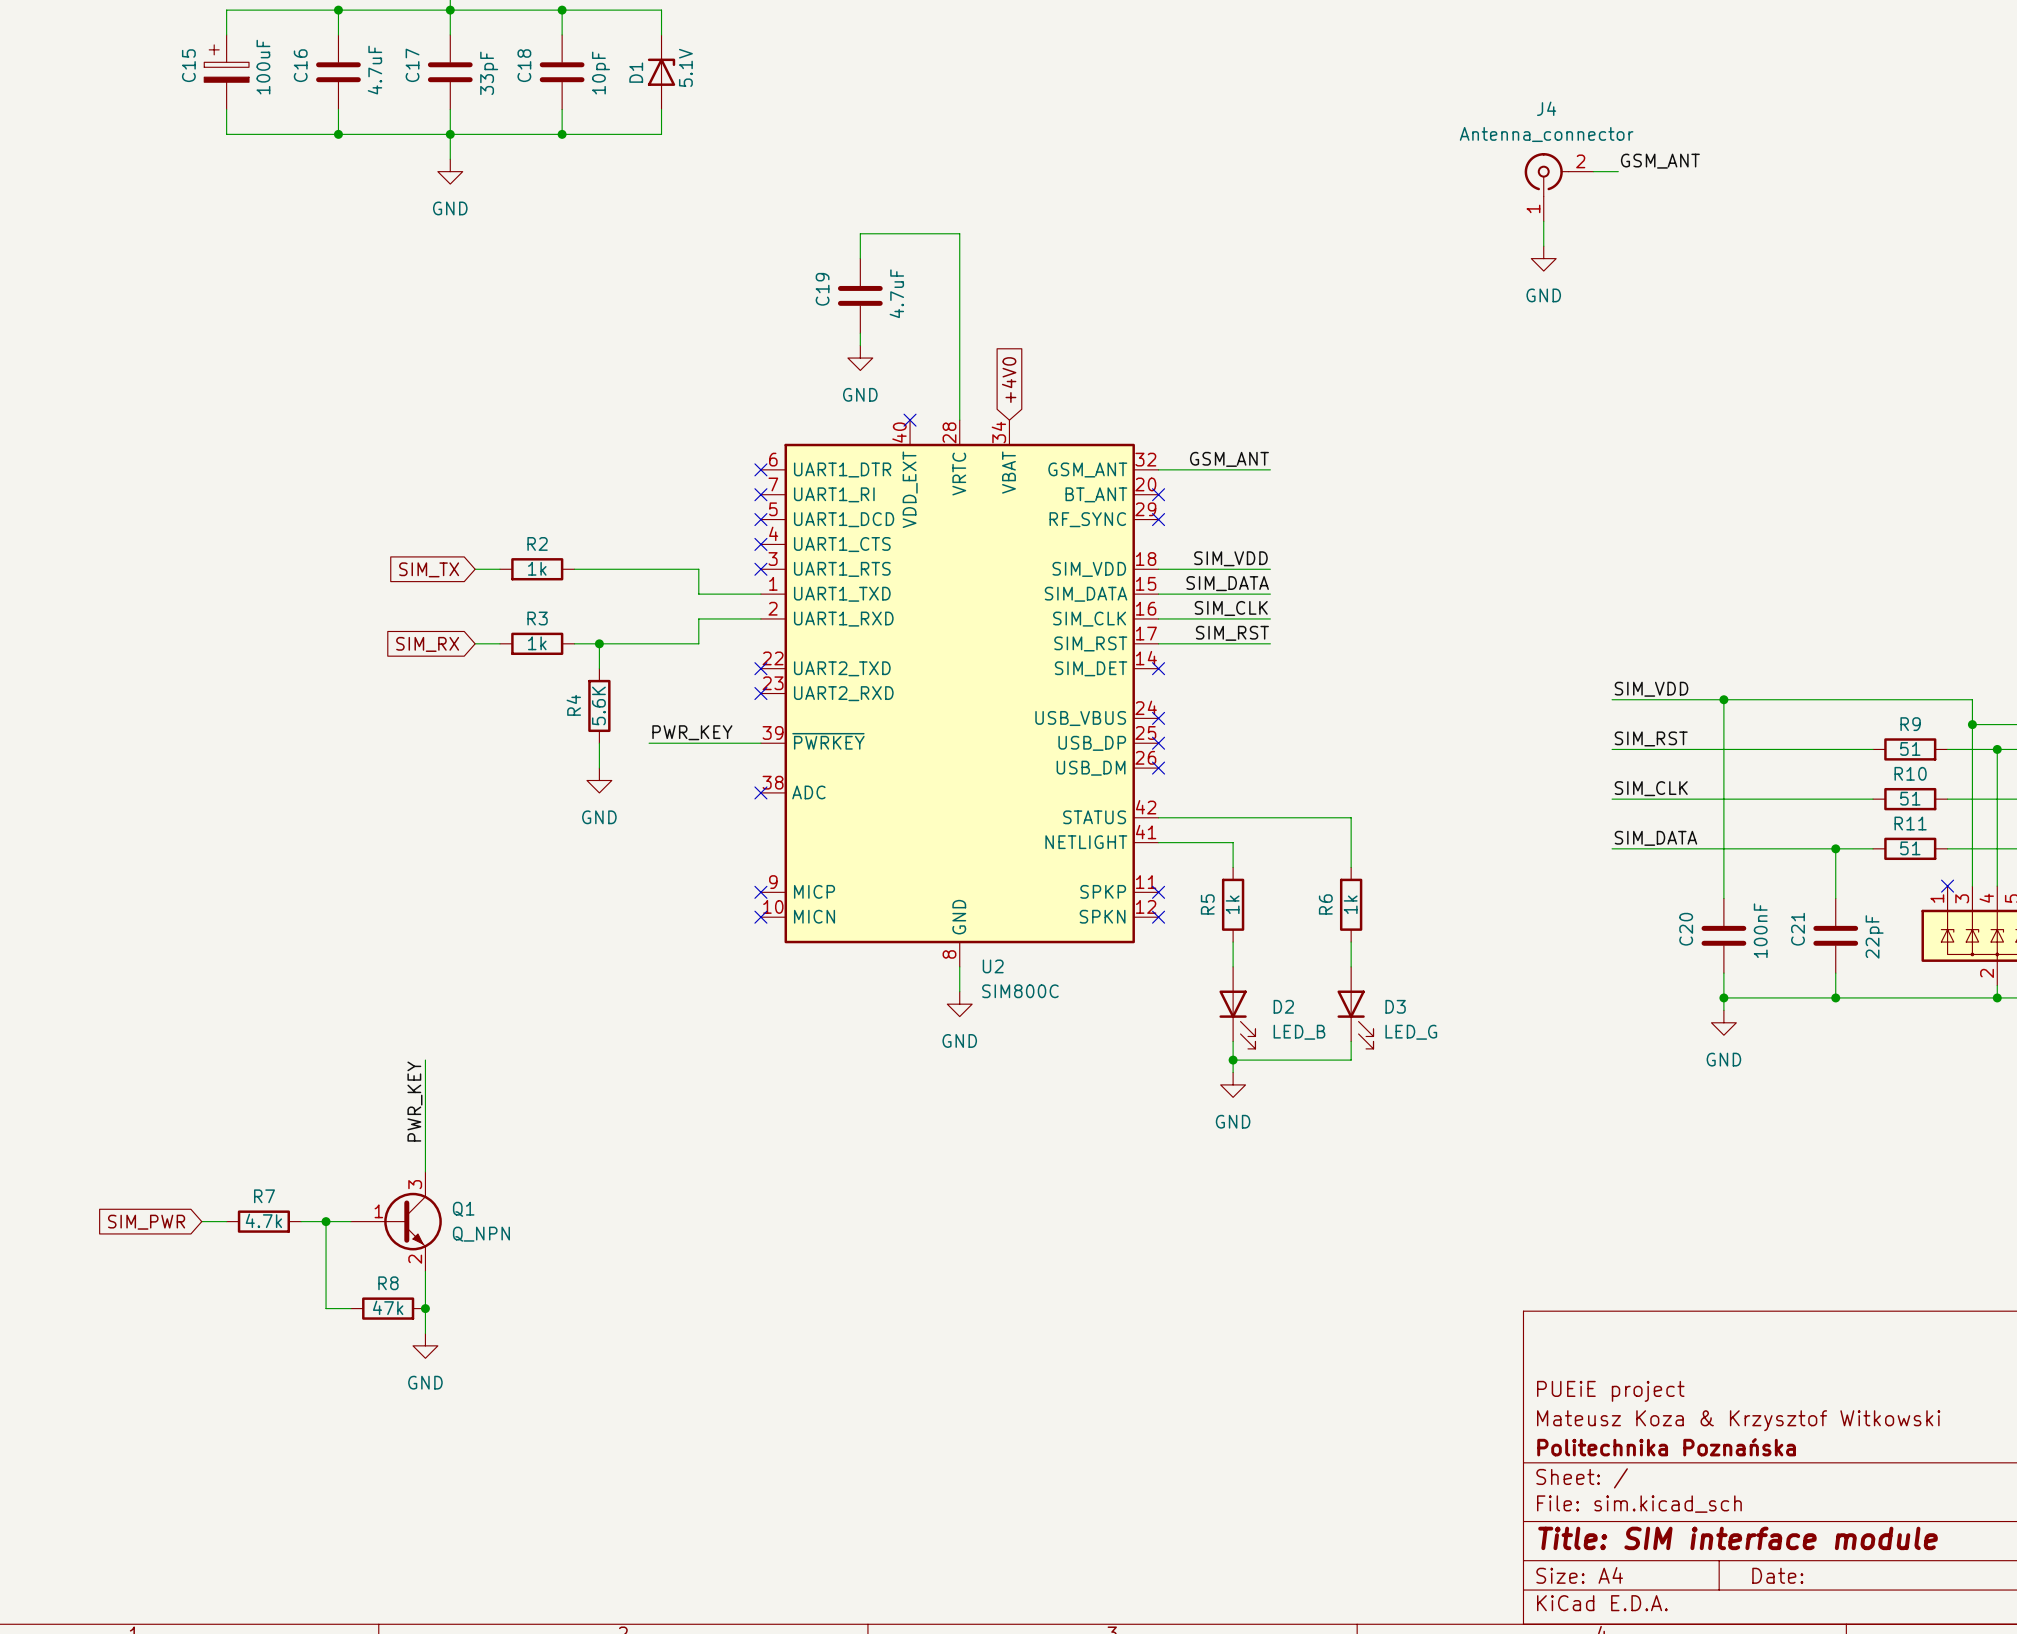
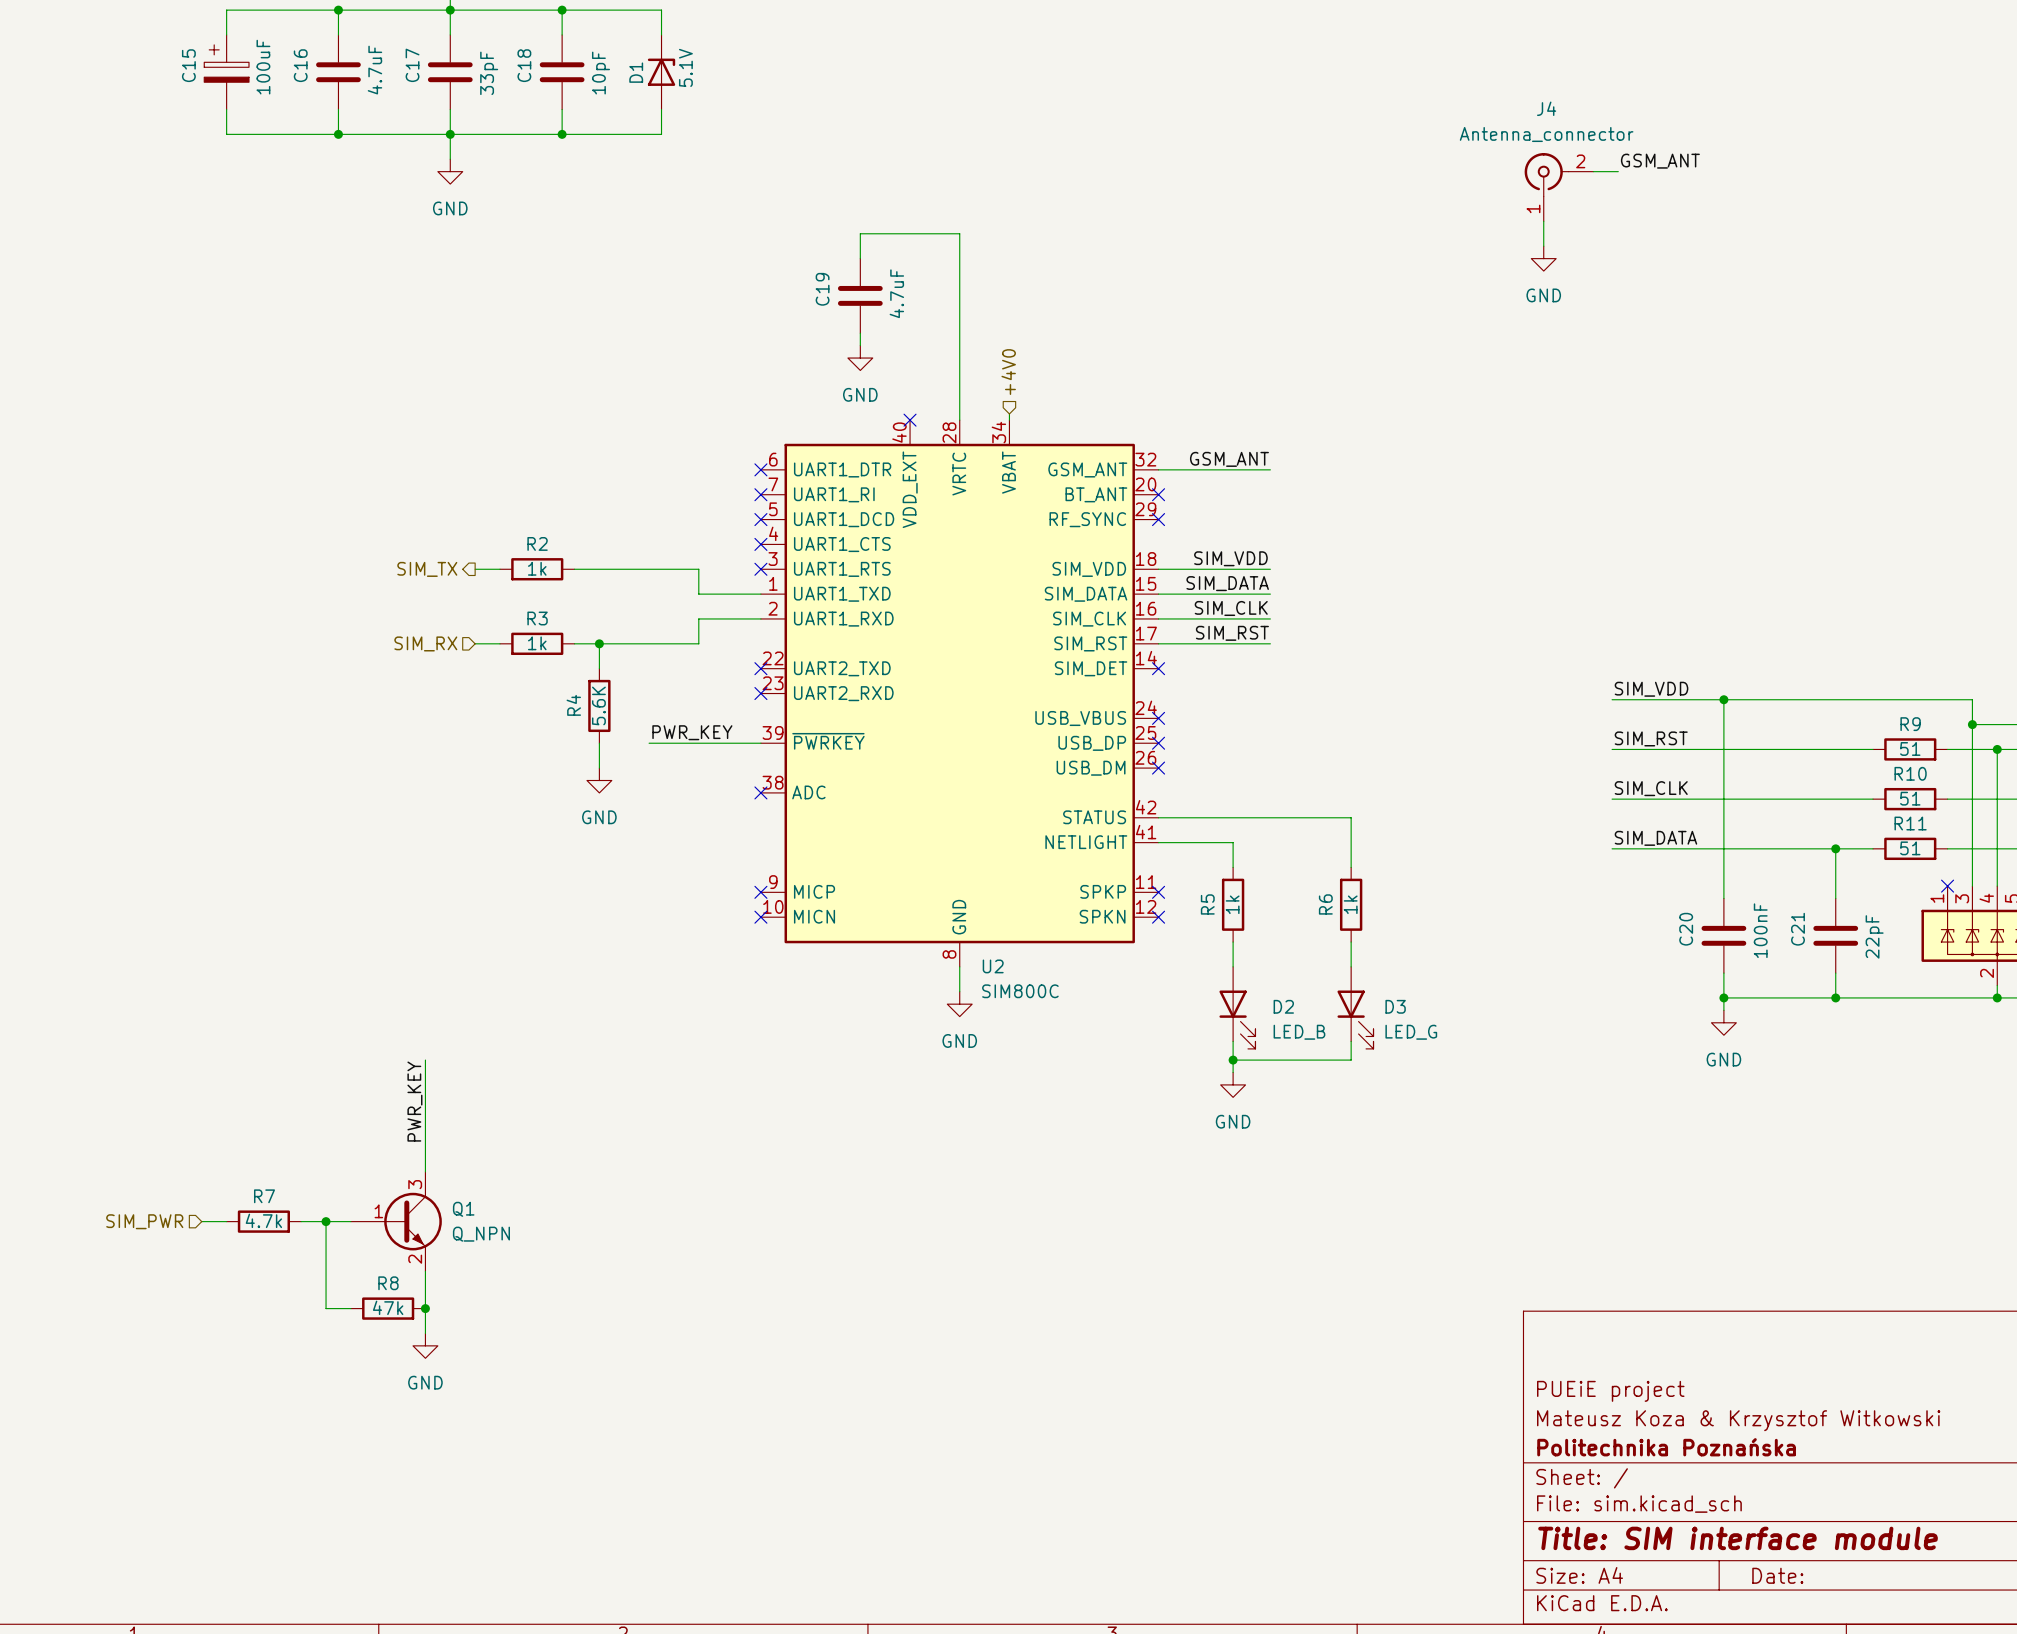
hierarchical label: none -> +4V0 (1008, 372)
global label: +4V0 (1009, 380) -> none
wire: none -> (1009, 413) (1009, 420)
hierarchical label: none -> SIM_TX (427, 569)
global label: SIM_TX (429, 569) -> none
hierarchical label: none -> SIM_RX (425, 643)
global label: SIM_RX (427, 644) -> none
hierarchical label: none -> SIM_PWR (144, 1221)
global label: SIM_PWR (146, 1222) -> none

